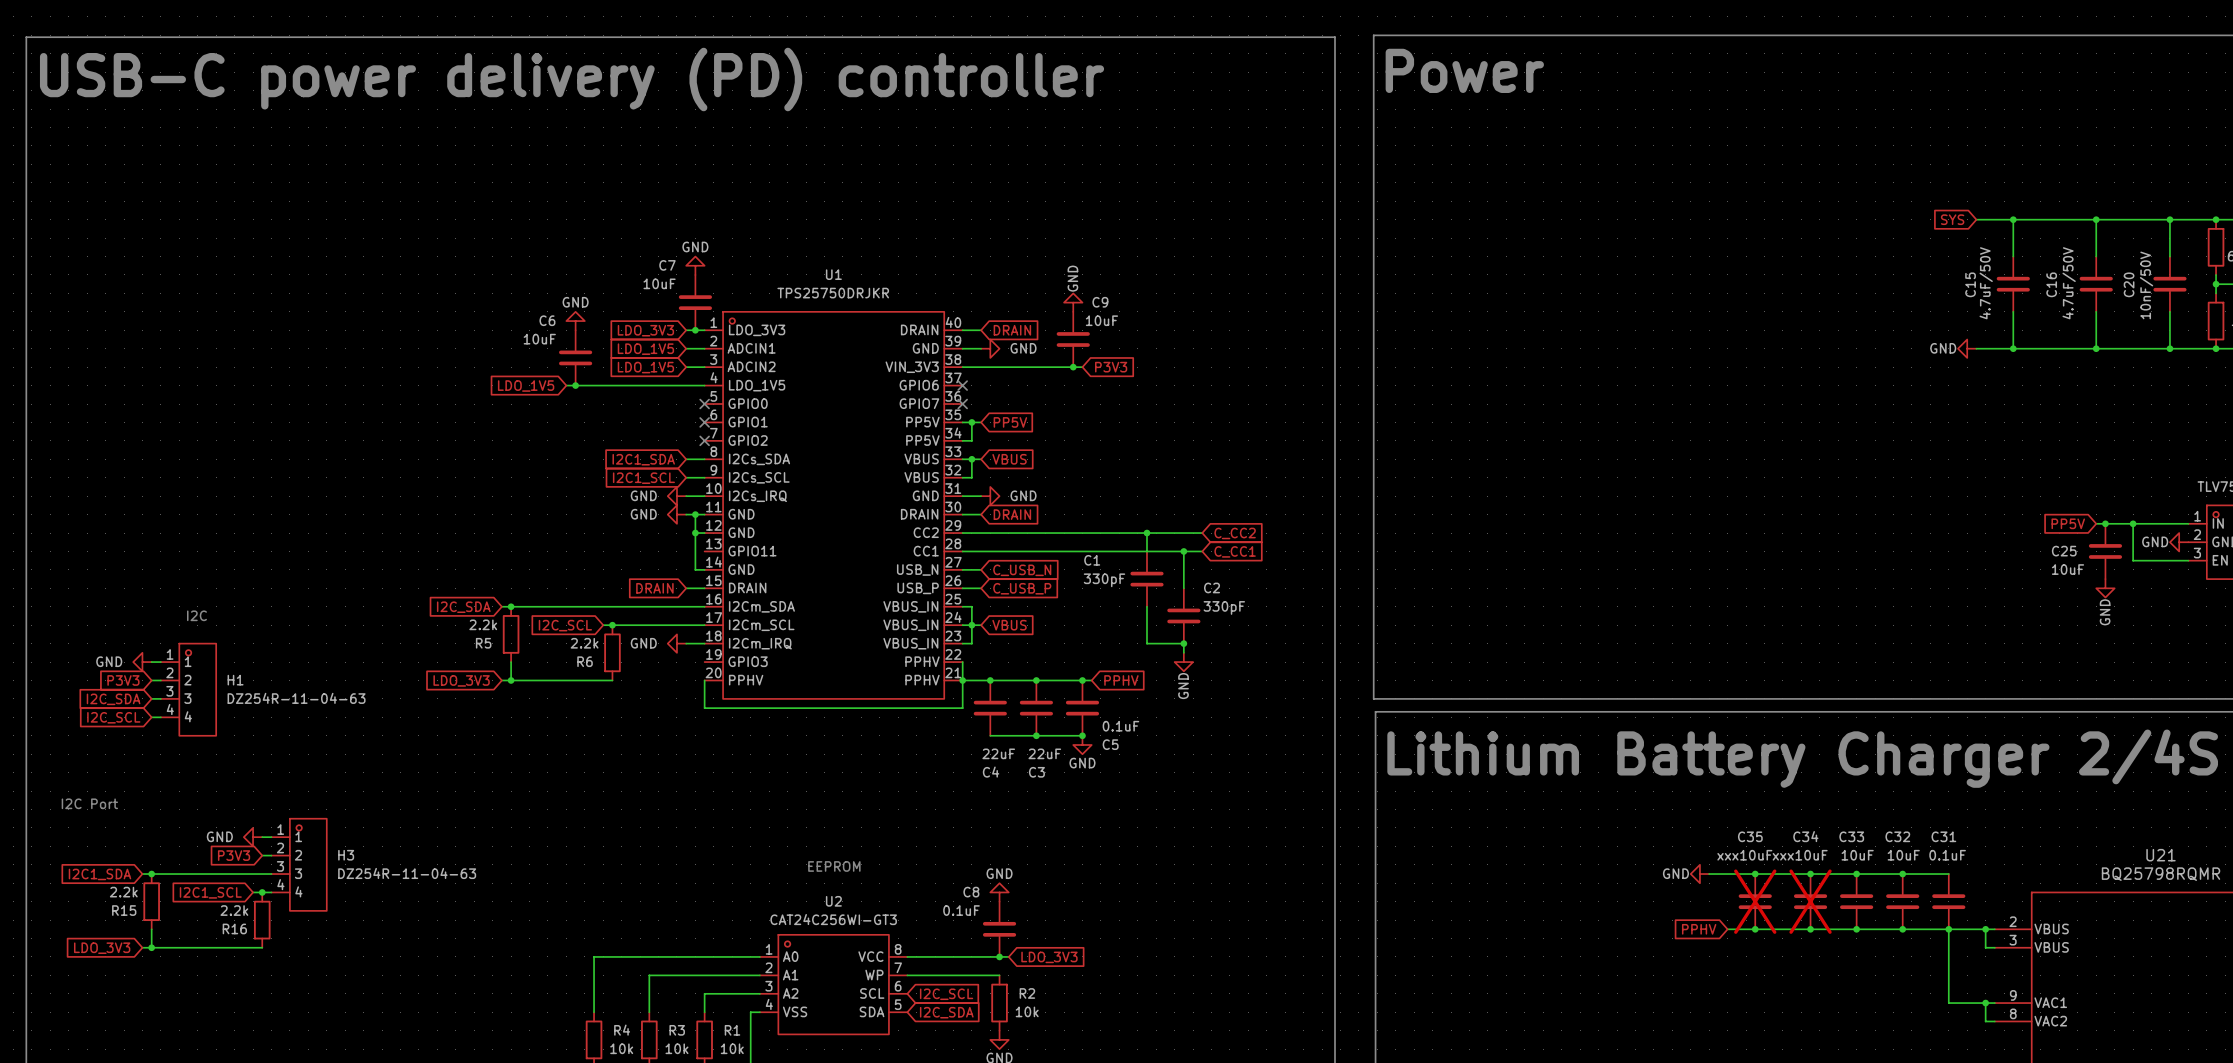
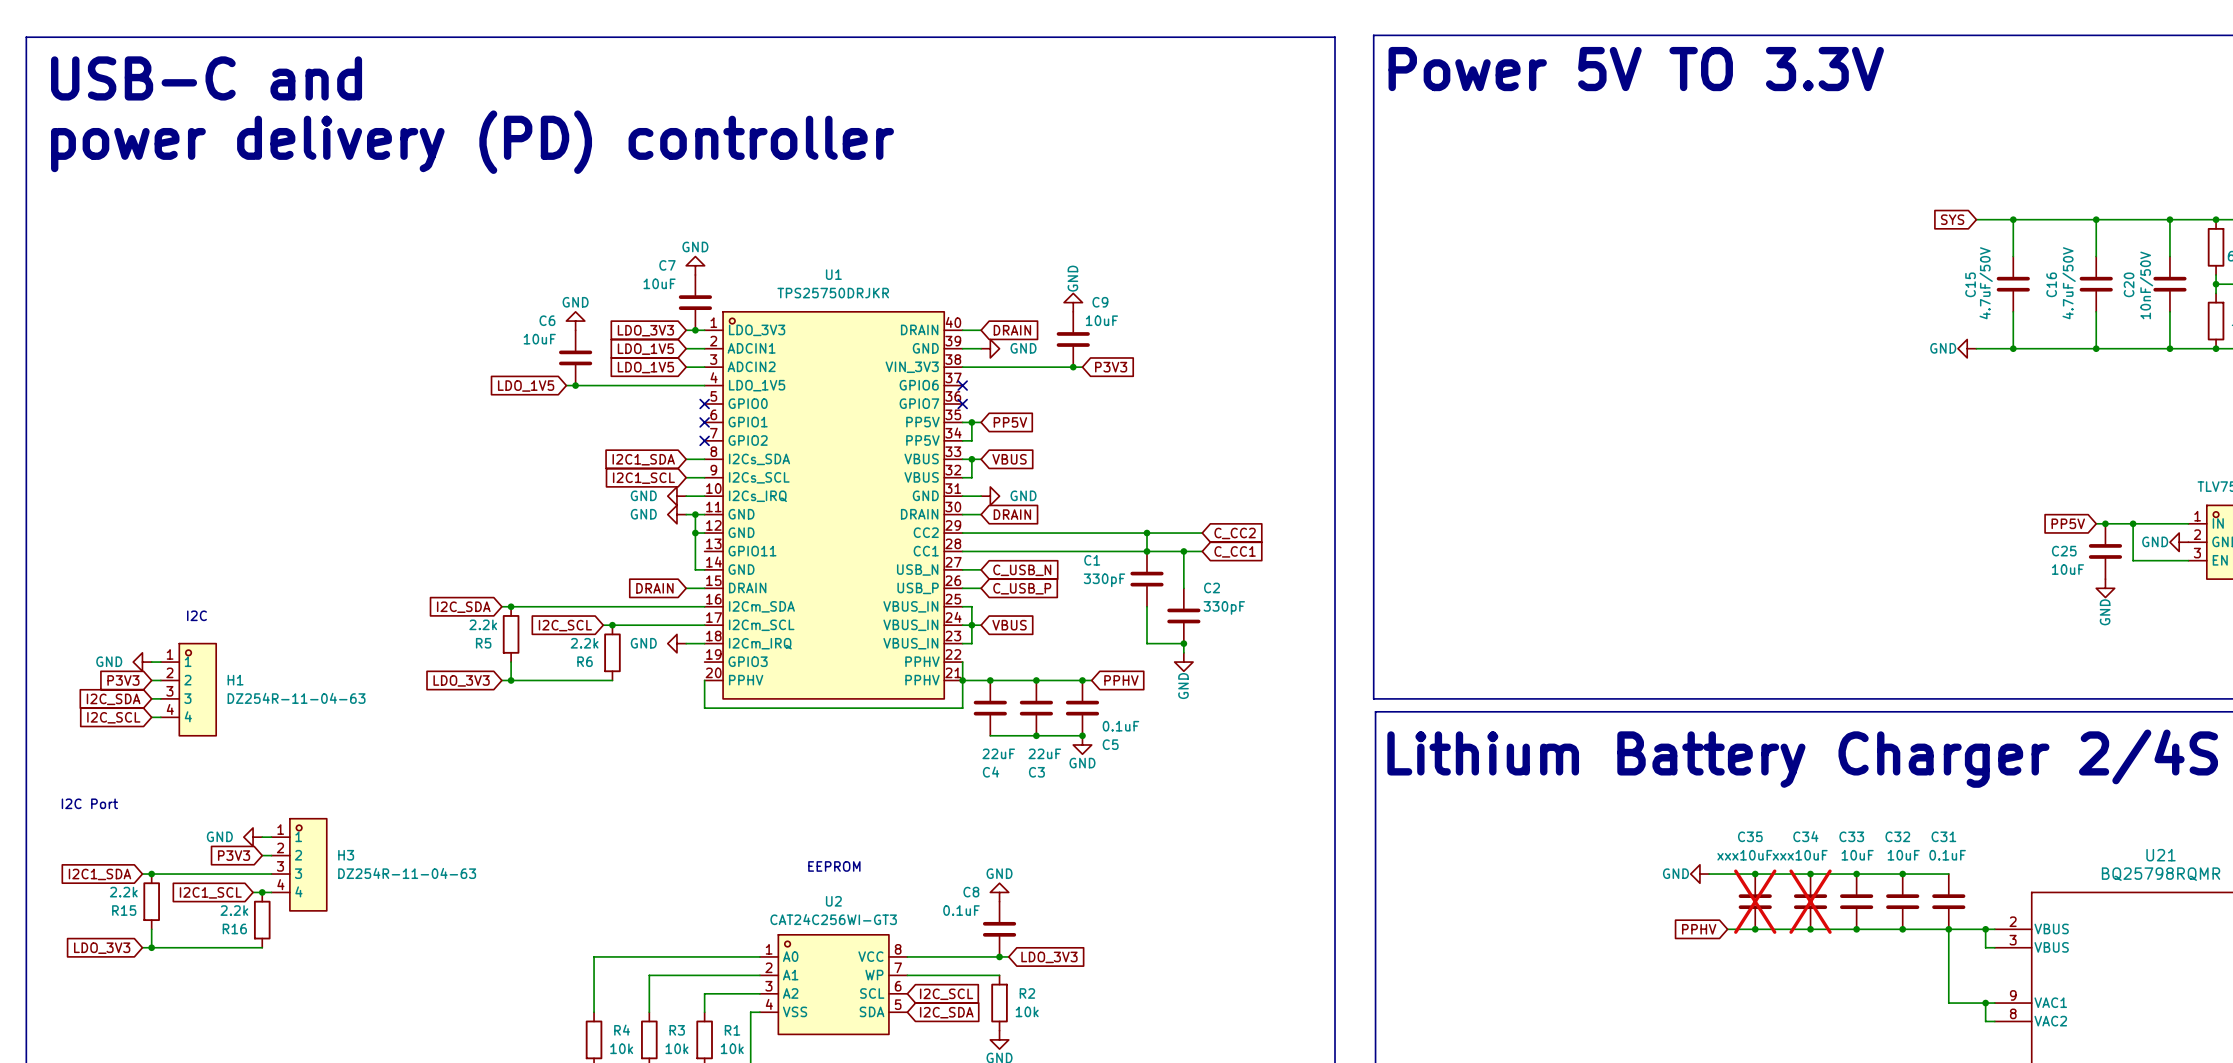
text: none -> Power 5V TO 3.3V (1636, 69)
text: Power (1464, 70) -> none
text: none -> USB-C and (206, 78)
text: USB-C power delivery (PD) controller (572, 79) -> power delivery (PD) controller (472, 142)
junction: none -> (1146, 551)

